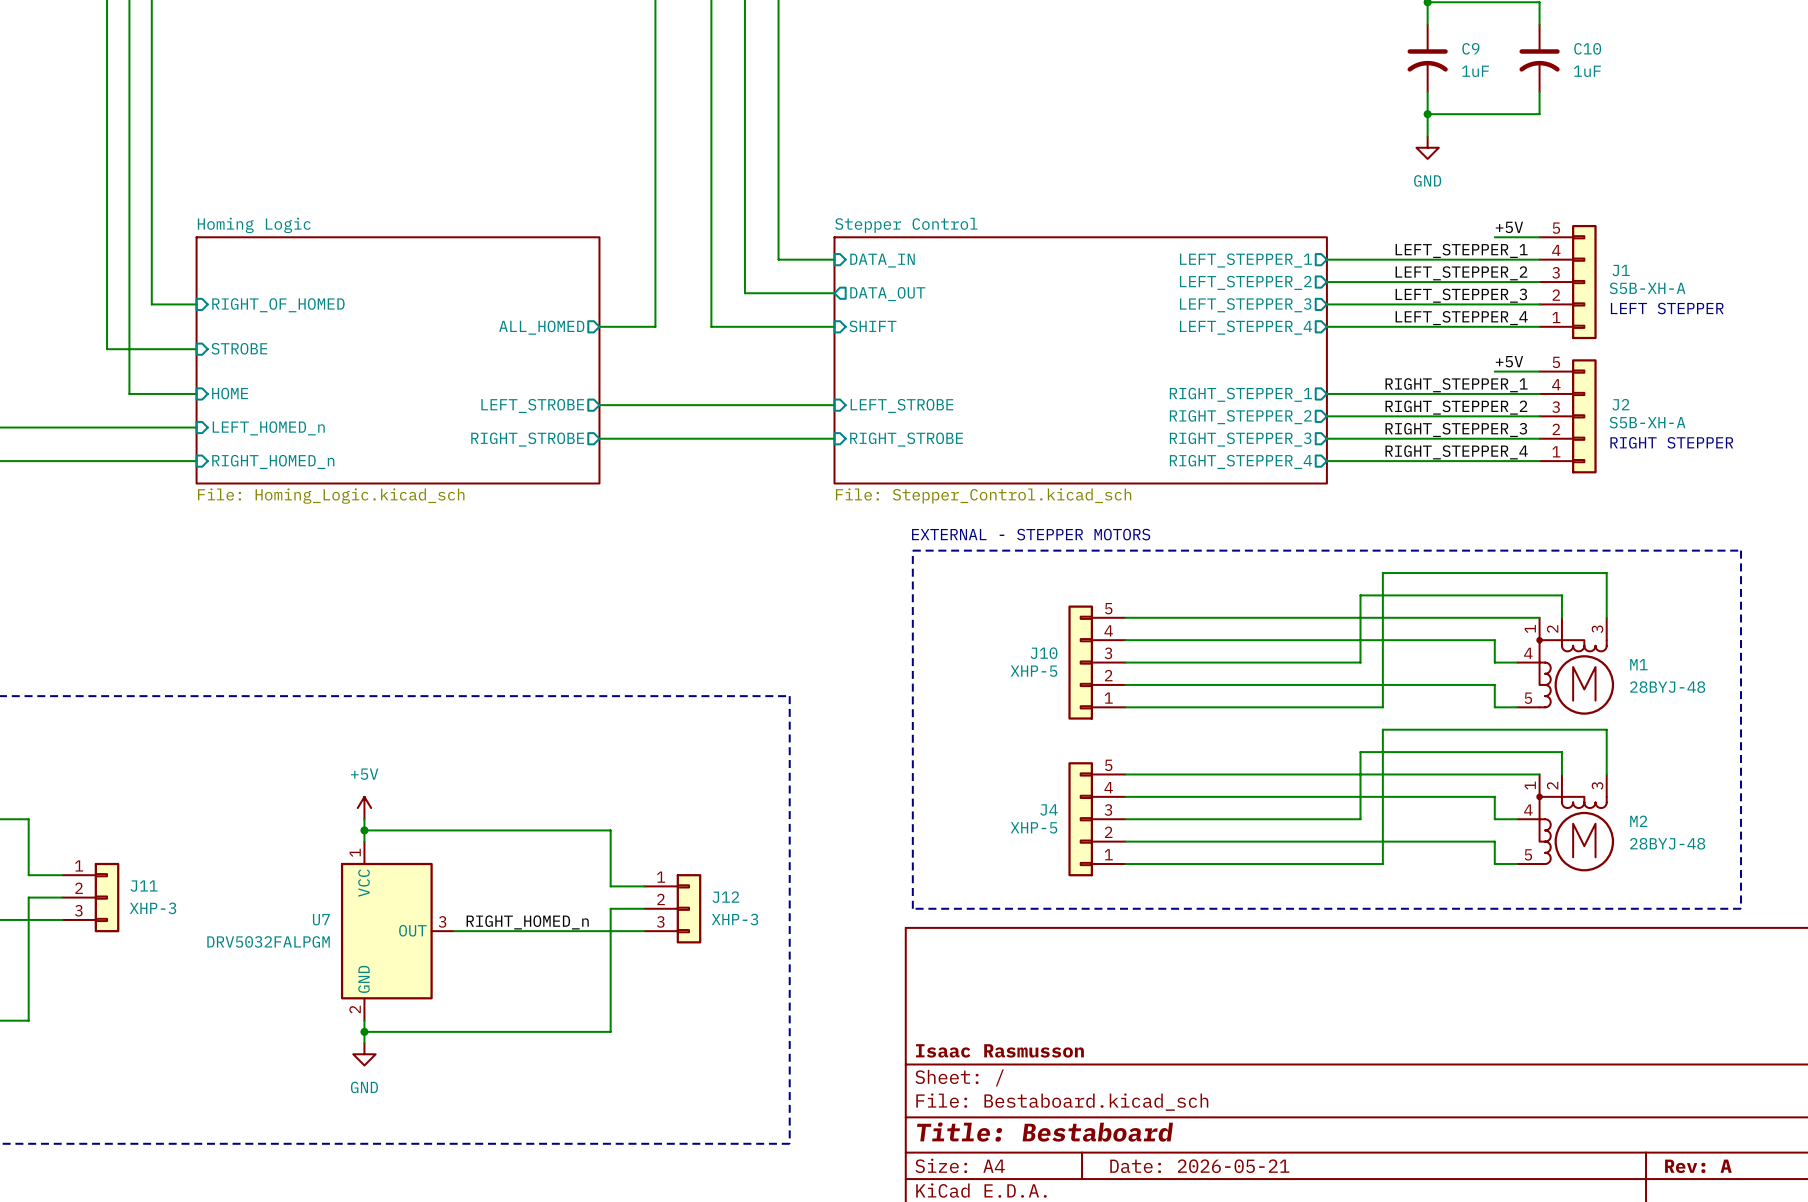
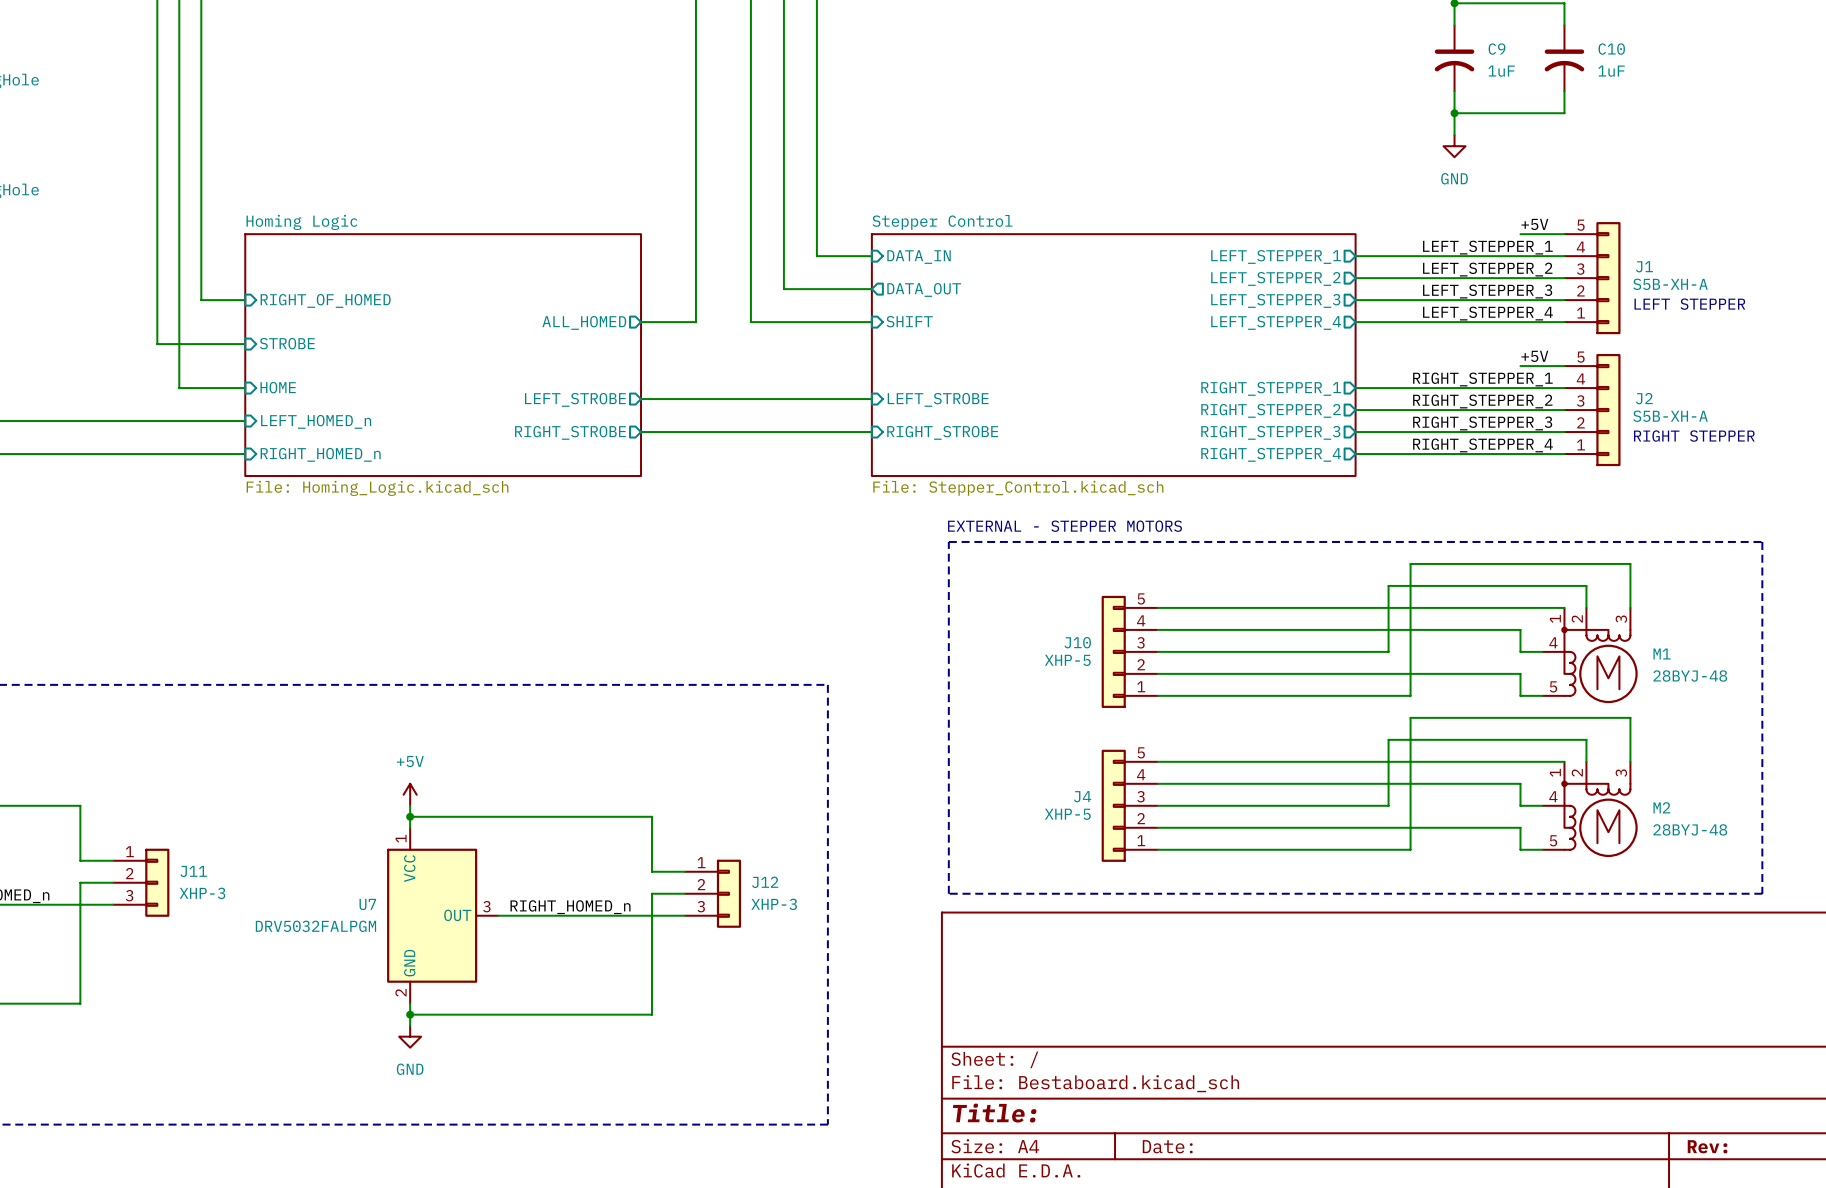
title block: Isaac Rasmusson (999, 1050) -> none
title block: Title: Bestaboard (1045, 1132) -> Title: (994, 1113)
title block: Date: 2026-05-21 (1199, 1166) -> Date: (1167, 1146)
title block: Rev: A (1698, 1166) -> Rev: (1707, 1146)

